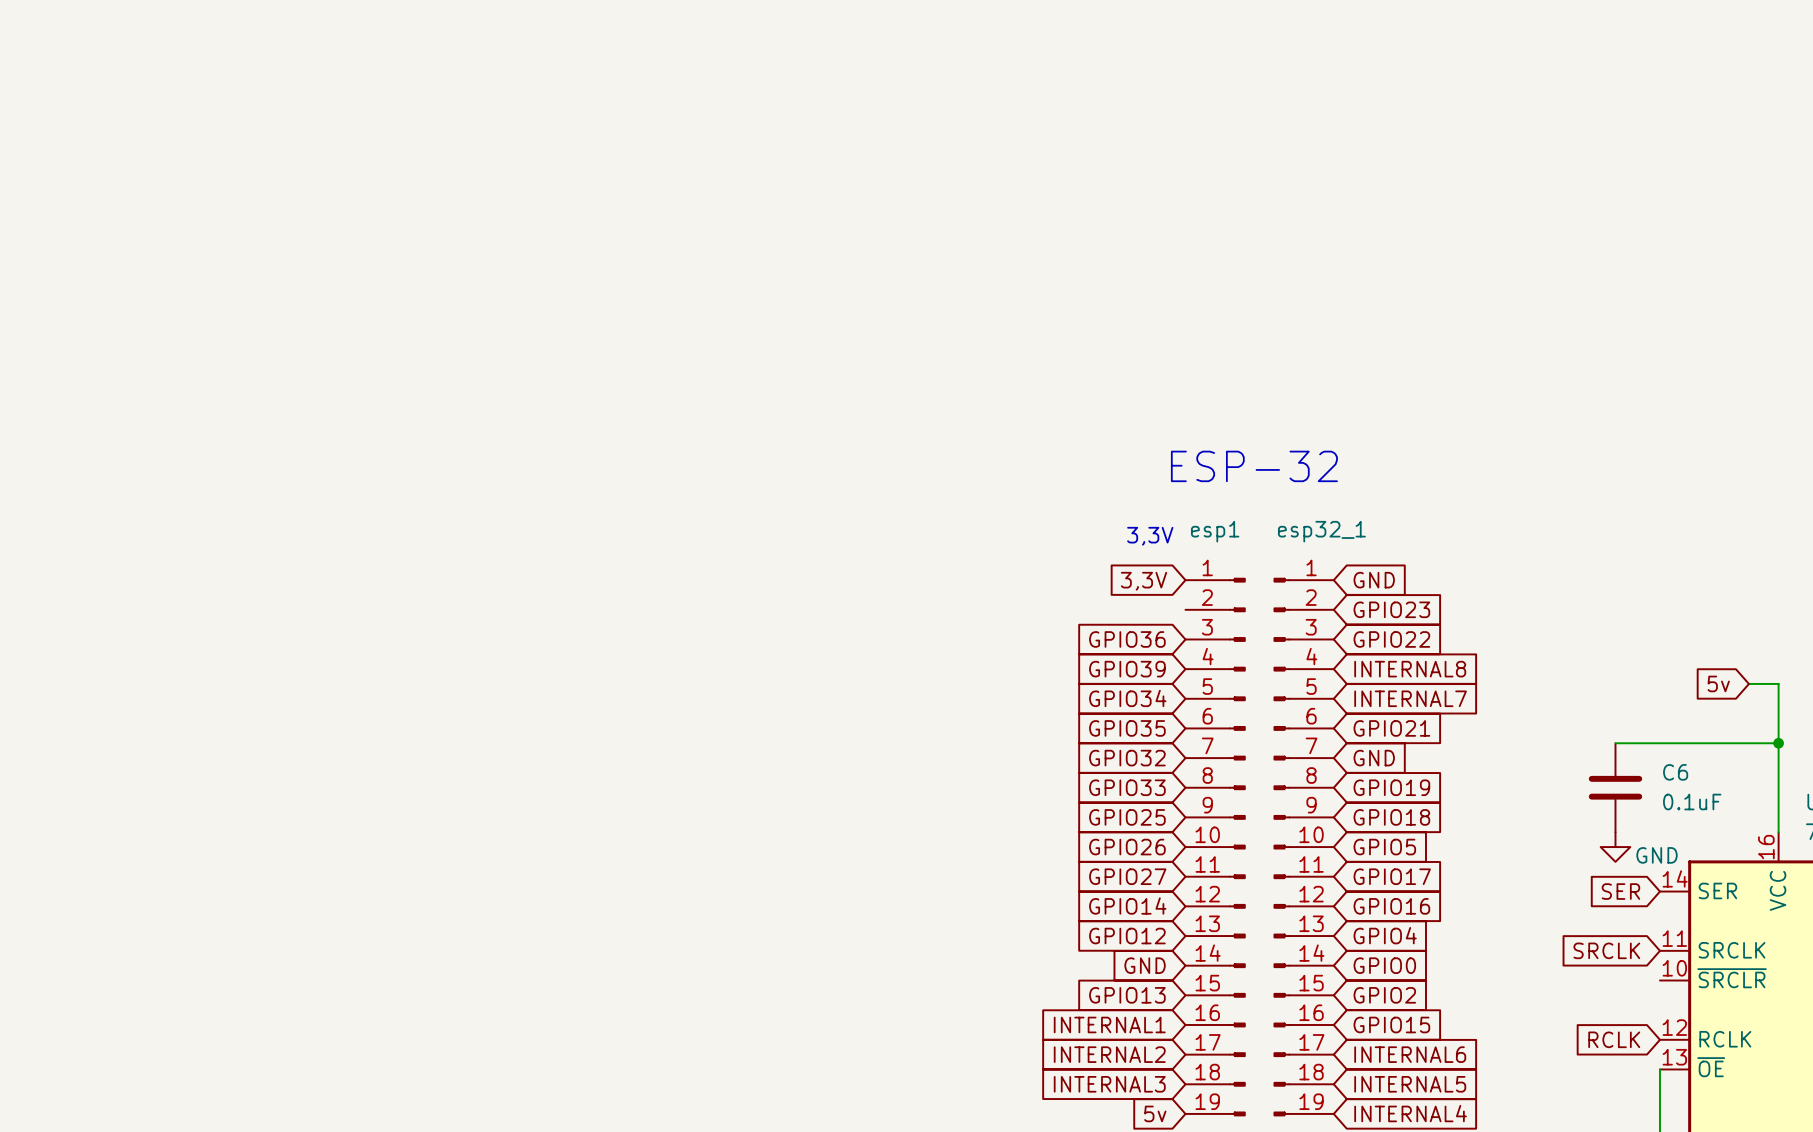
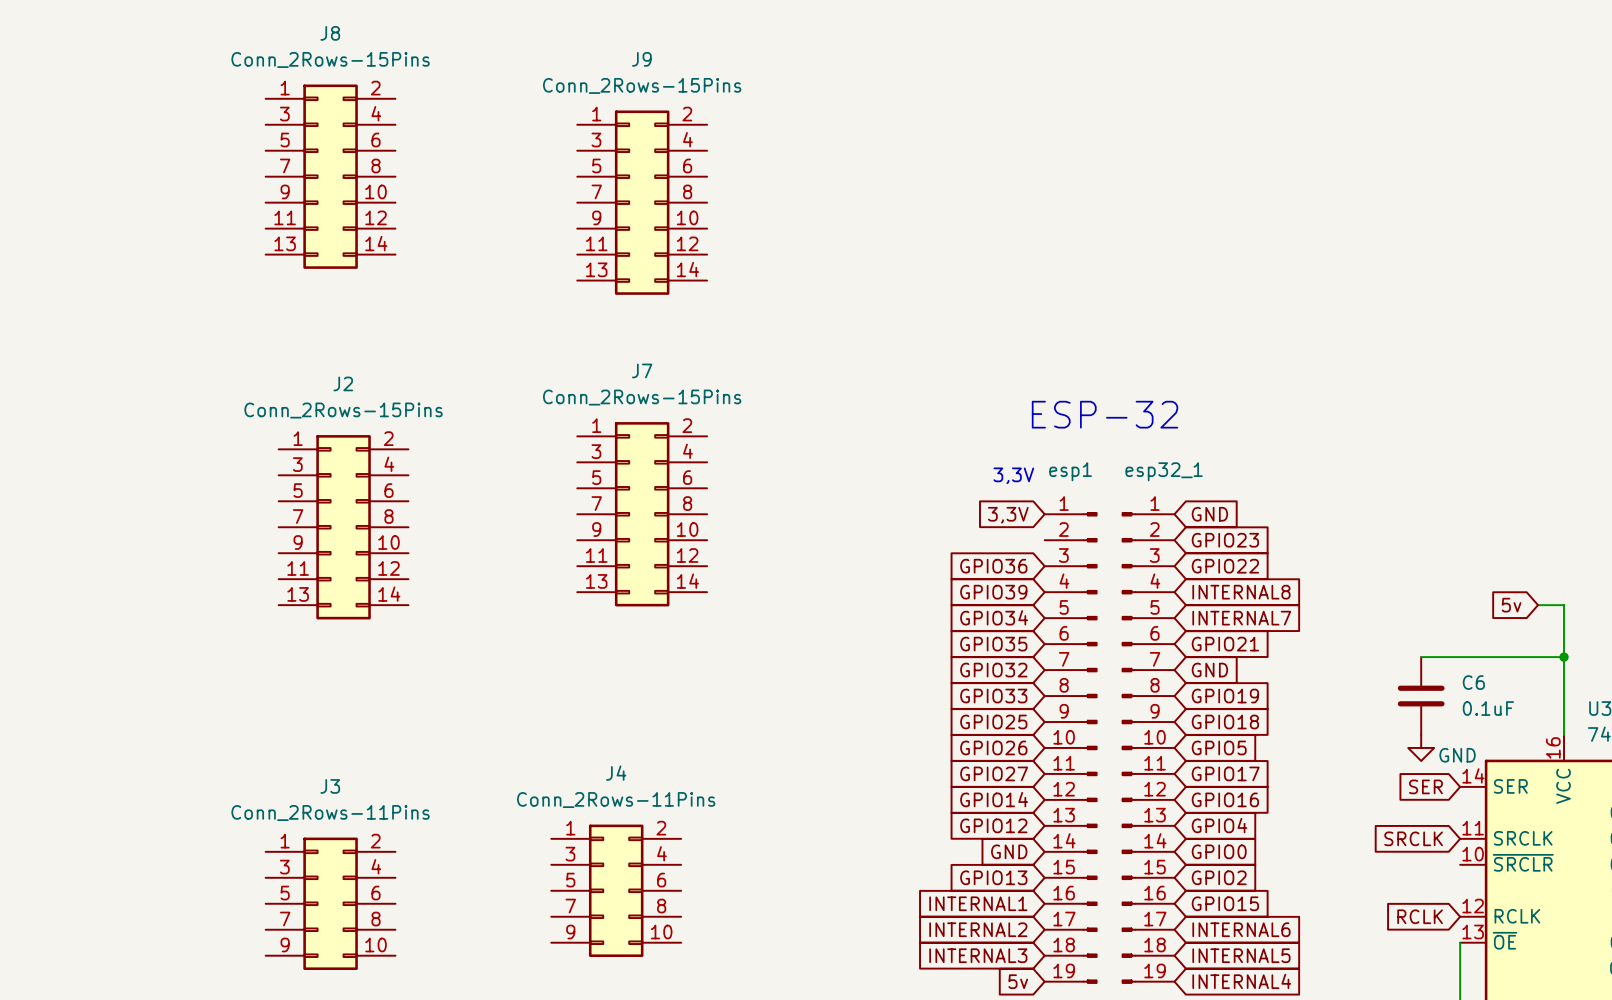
J8: none -> Conn_2Rows-15Pins (330, 176)
J9: none -> Conn_2Rows-15Pins (642, 202)
J7: none -> Conn_2Rows-15Pins (642, 514)
J2: none -> Conn_2Rows-15Pins (343, 527)
J4: none -> Conn_2Rows-11Pins (616, 890)
J3: none -> Conn_2Rows-11Pins (330, 903)

